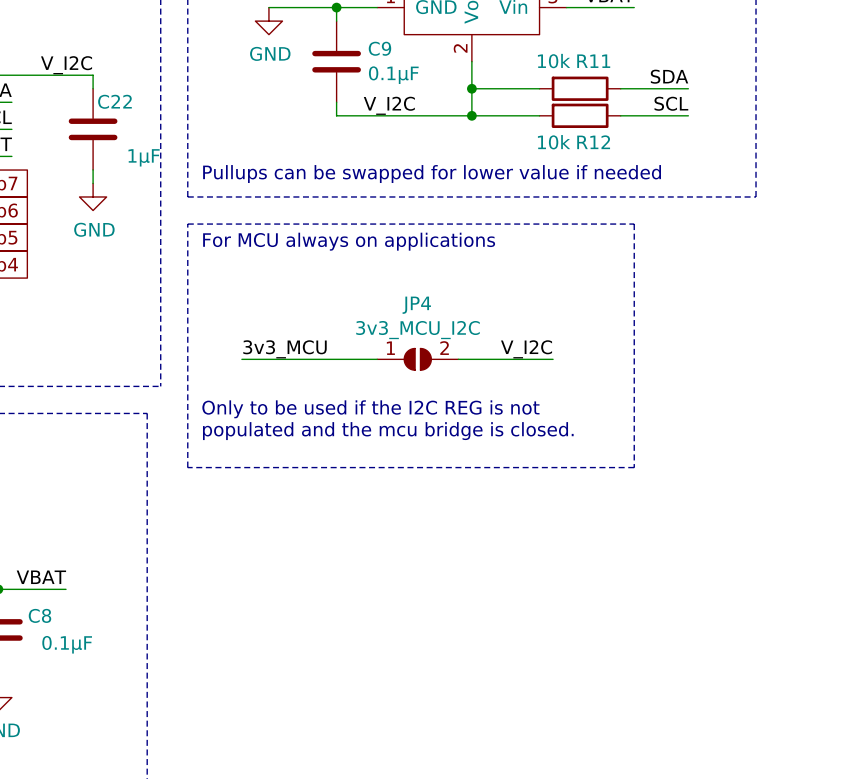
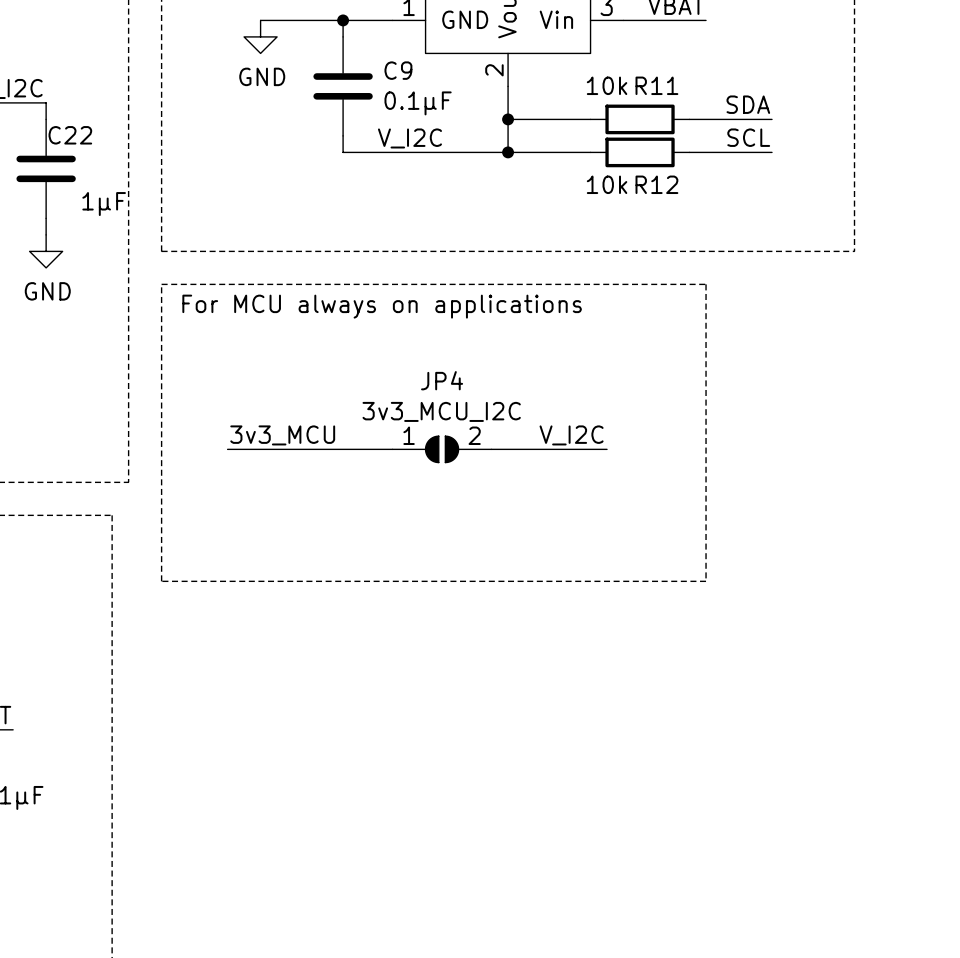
text: Pullups can be swapped for lower value if needed (432, 174) -> none
text: Only to be used if the I2C REG is not (370, 409) -> none
text: populated and the mcu bridge is closed. (388, 431) -> none

